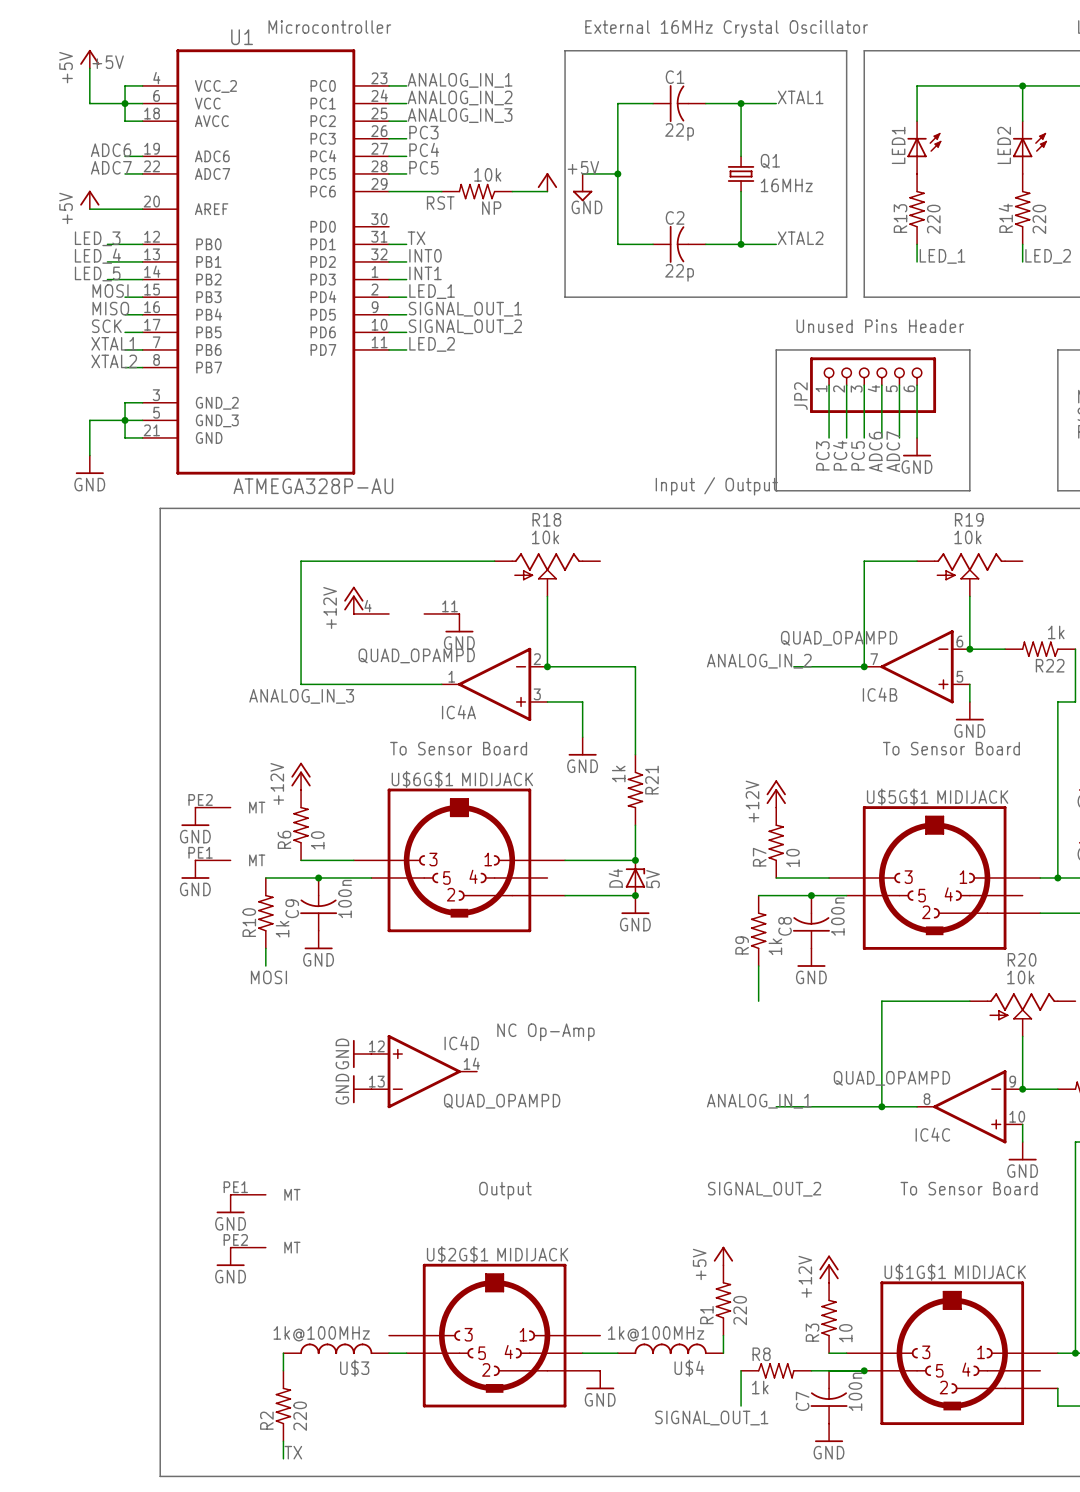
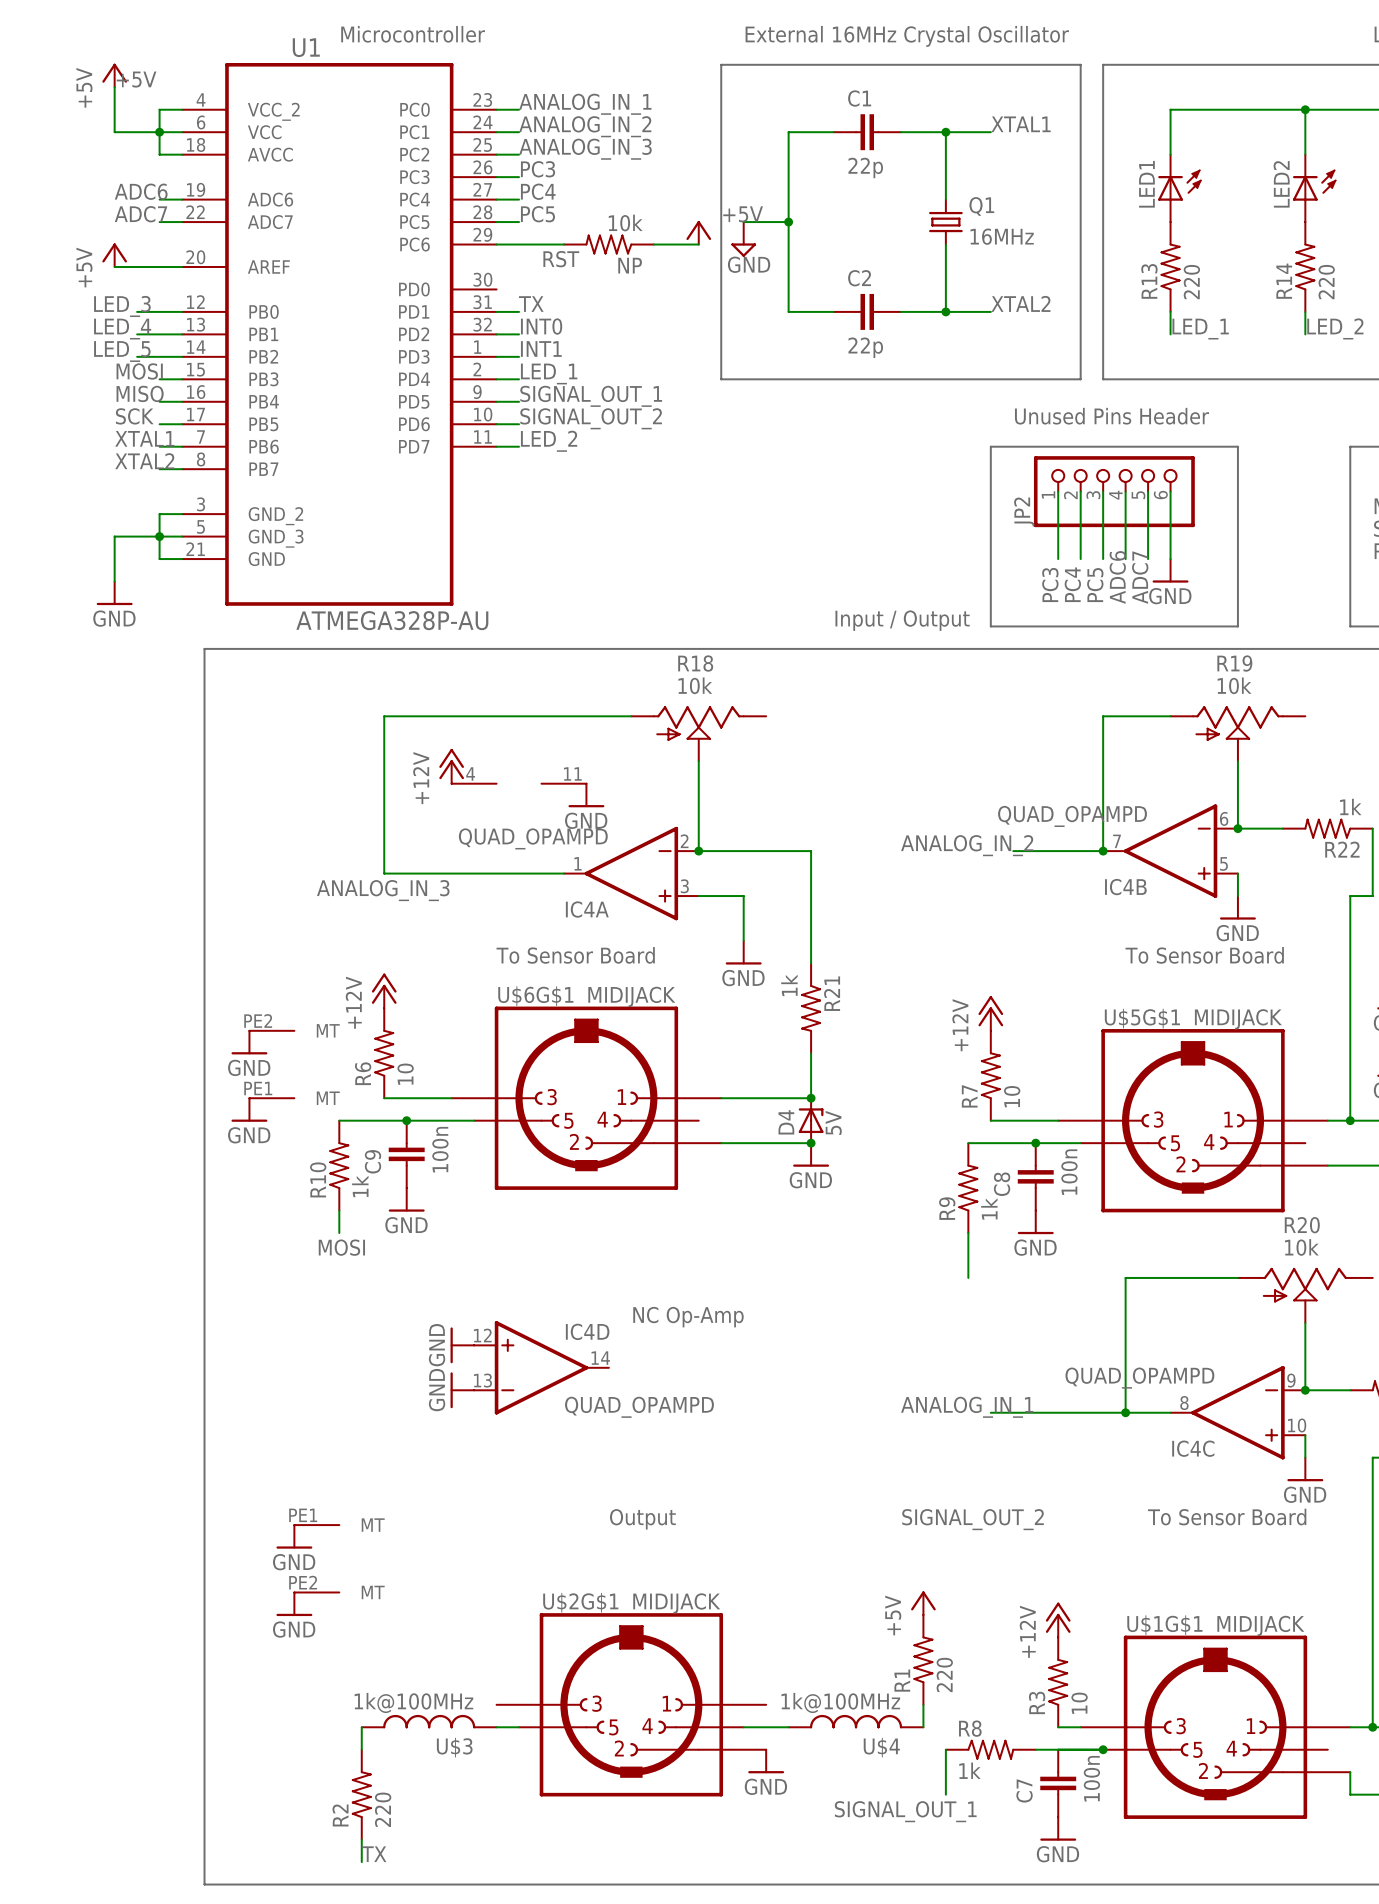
C1 symbol: [653, 85, 706, 123] -> [833, 114, 901, 151]
C2 symbol: [653, 225, 706, 263] -> [833, 293, 901, 330]
C9 symbol: [300, 877, 338, 931] -> [388, 1120, 425, 1189]
C8 symbol: [792, 895, 830, 949] -> [1017, 1143, 1054, 1211]
C7 symbol: [810, 1370, 848, 1424] -> [1040, 1749, 1077, 1818]

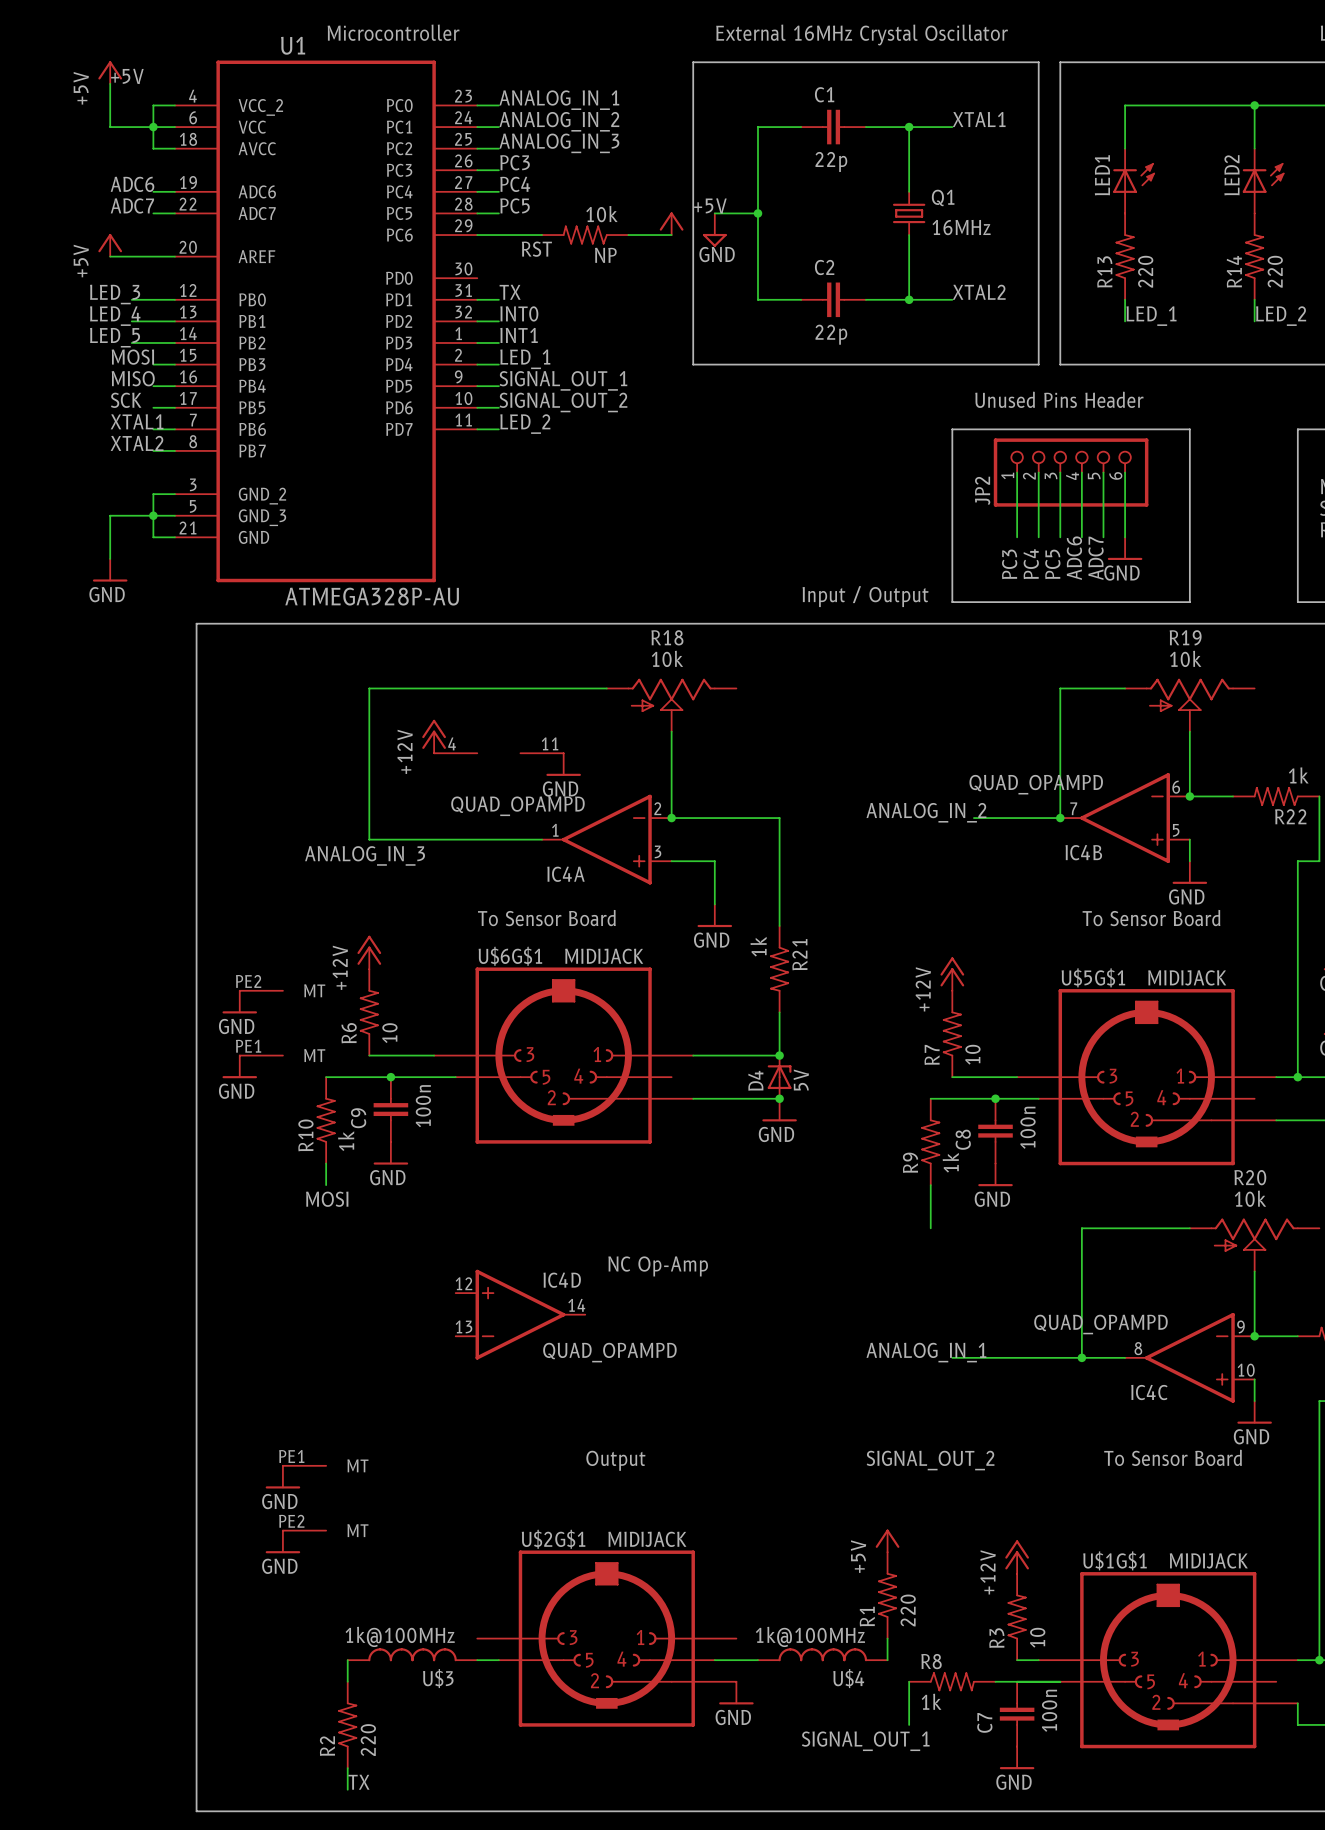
power symbol: GND (462, 1345) -> none
power symbol: GND (462, 1390) -> none
junction: (1103, 1749) -> none

